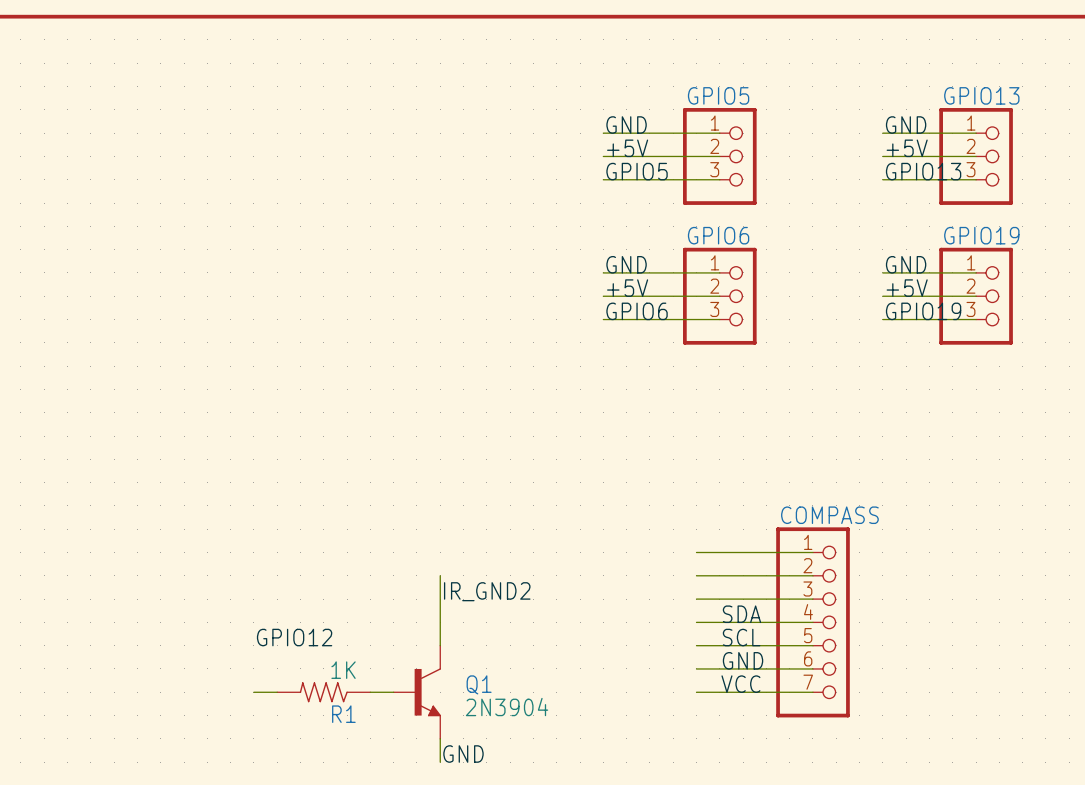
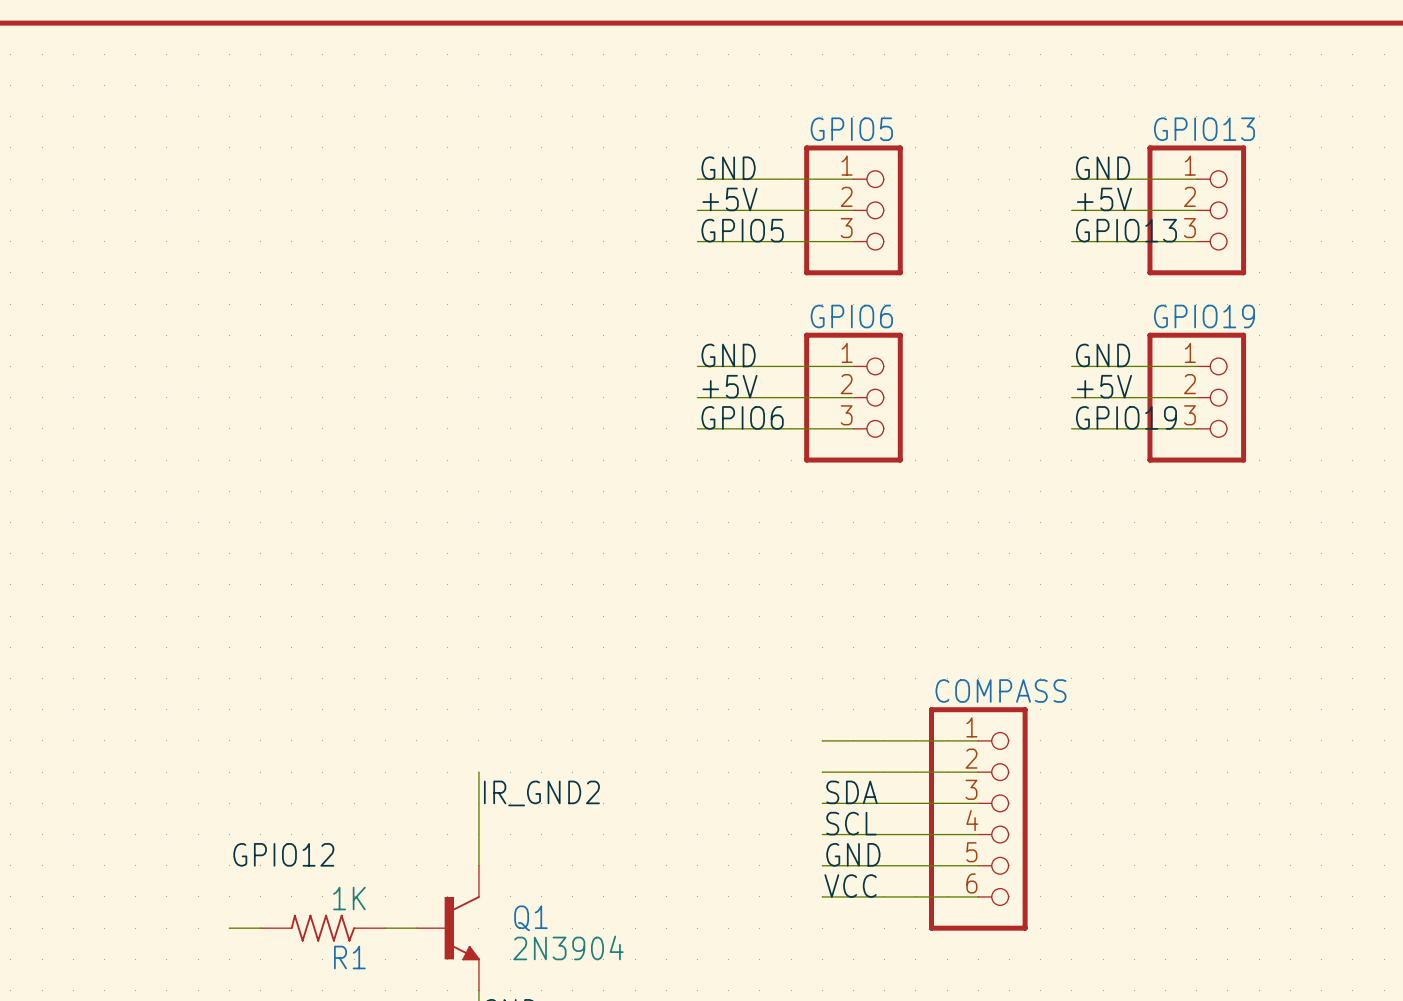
COMPASS: none -> (978, 818)
label position: SDA (741, 614) -> SDA (851, 792)
COMPASS: (812, 622) -> none
label position: SCL (741, 637) -> SCL (851, 823)
label position: GND (743, 660) -> GND (853, 854)
label position: VCC (740, 684) -> VCC (850, 886)
wire: (696, 692) (812, 692) -> none

